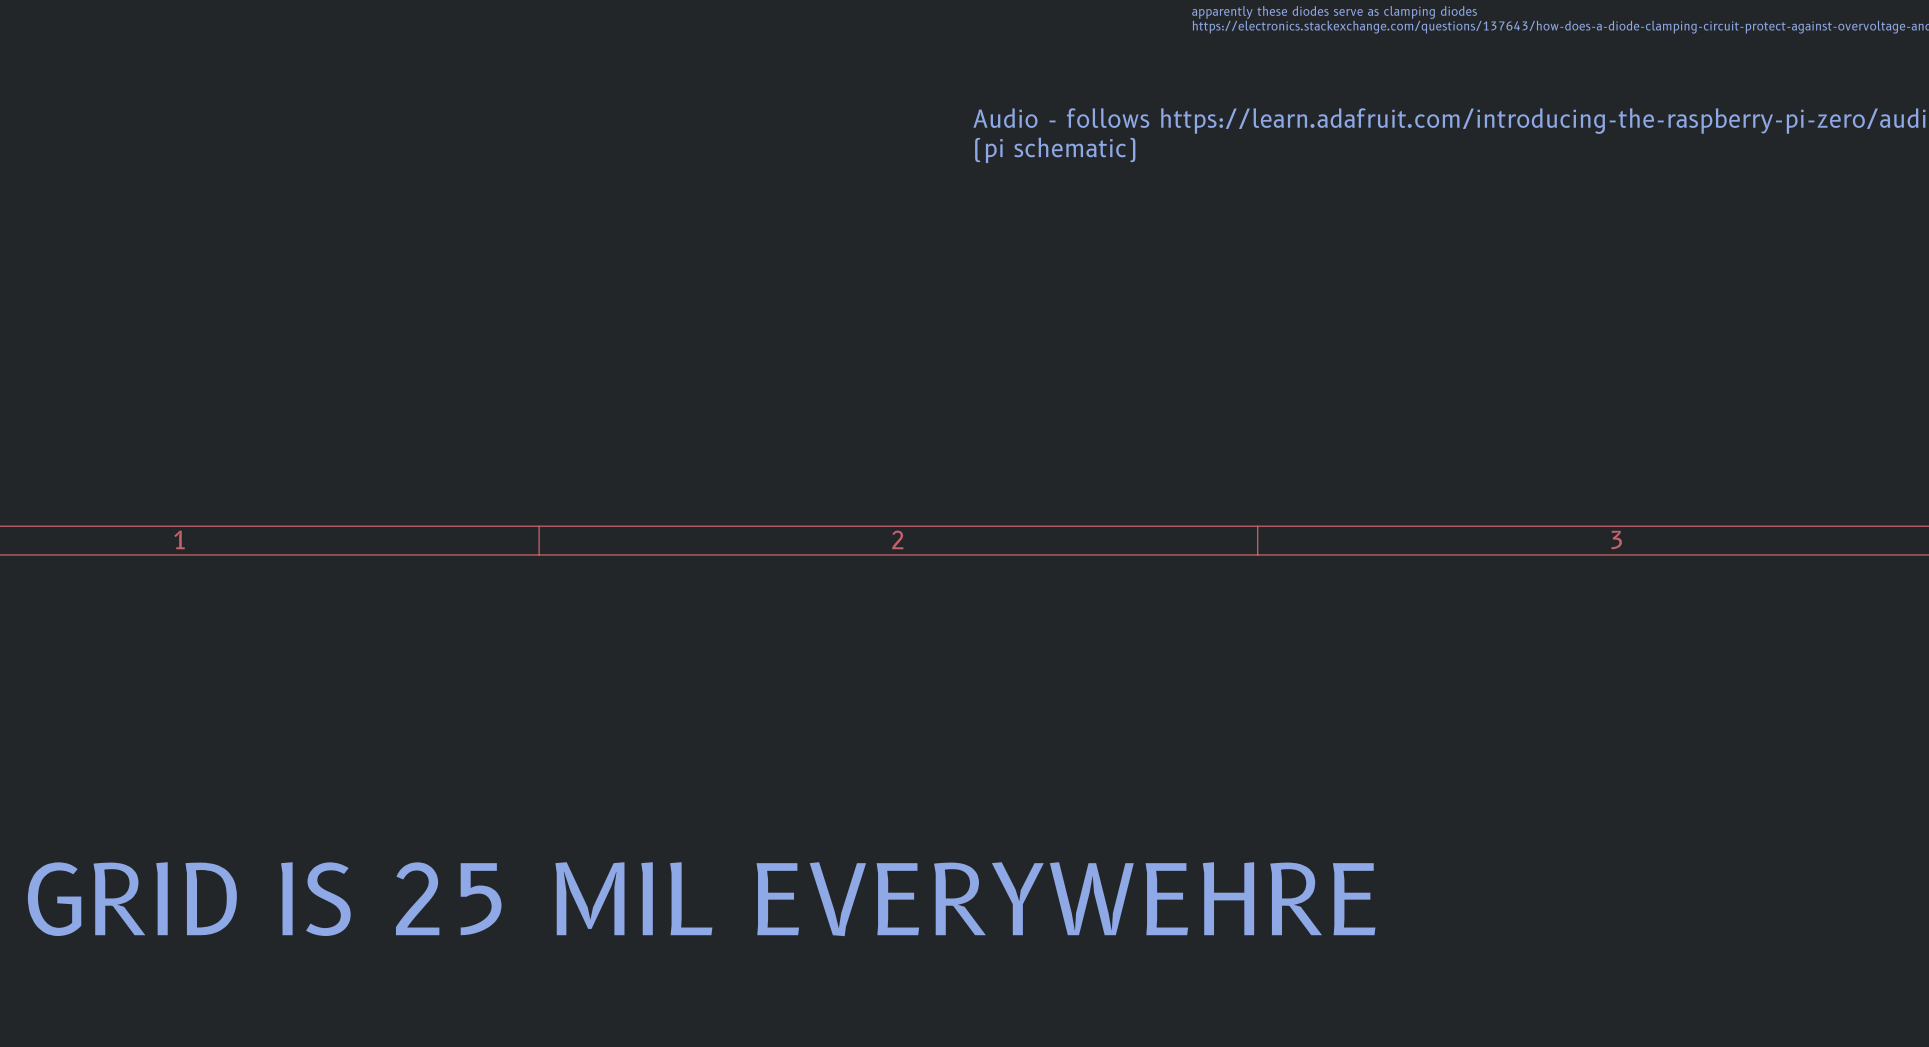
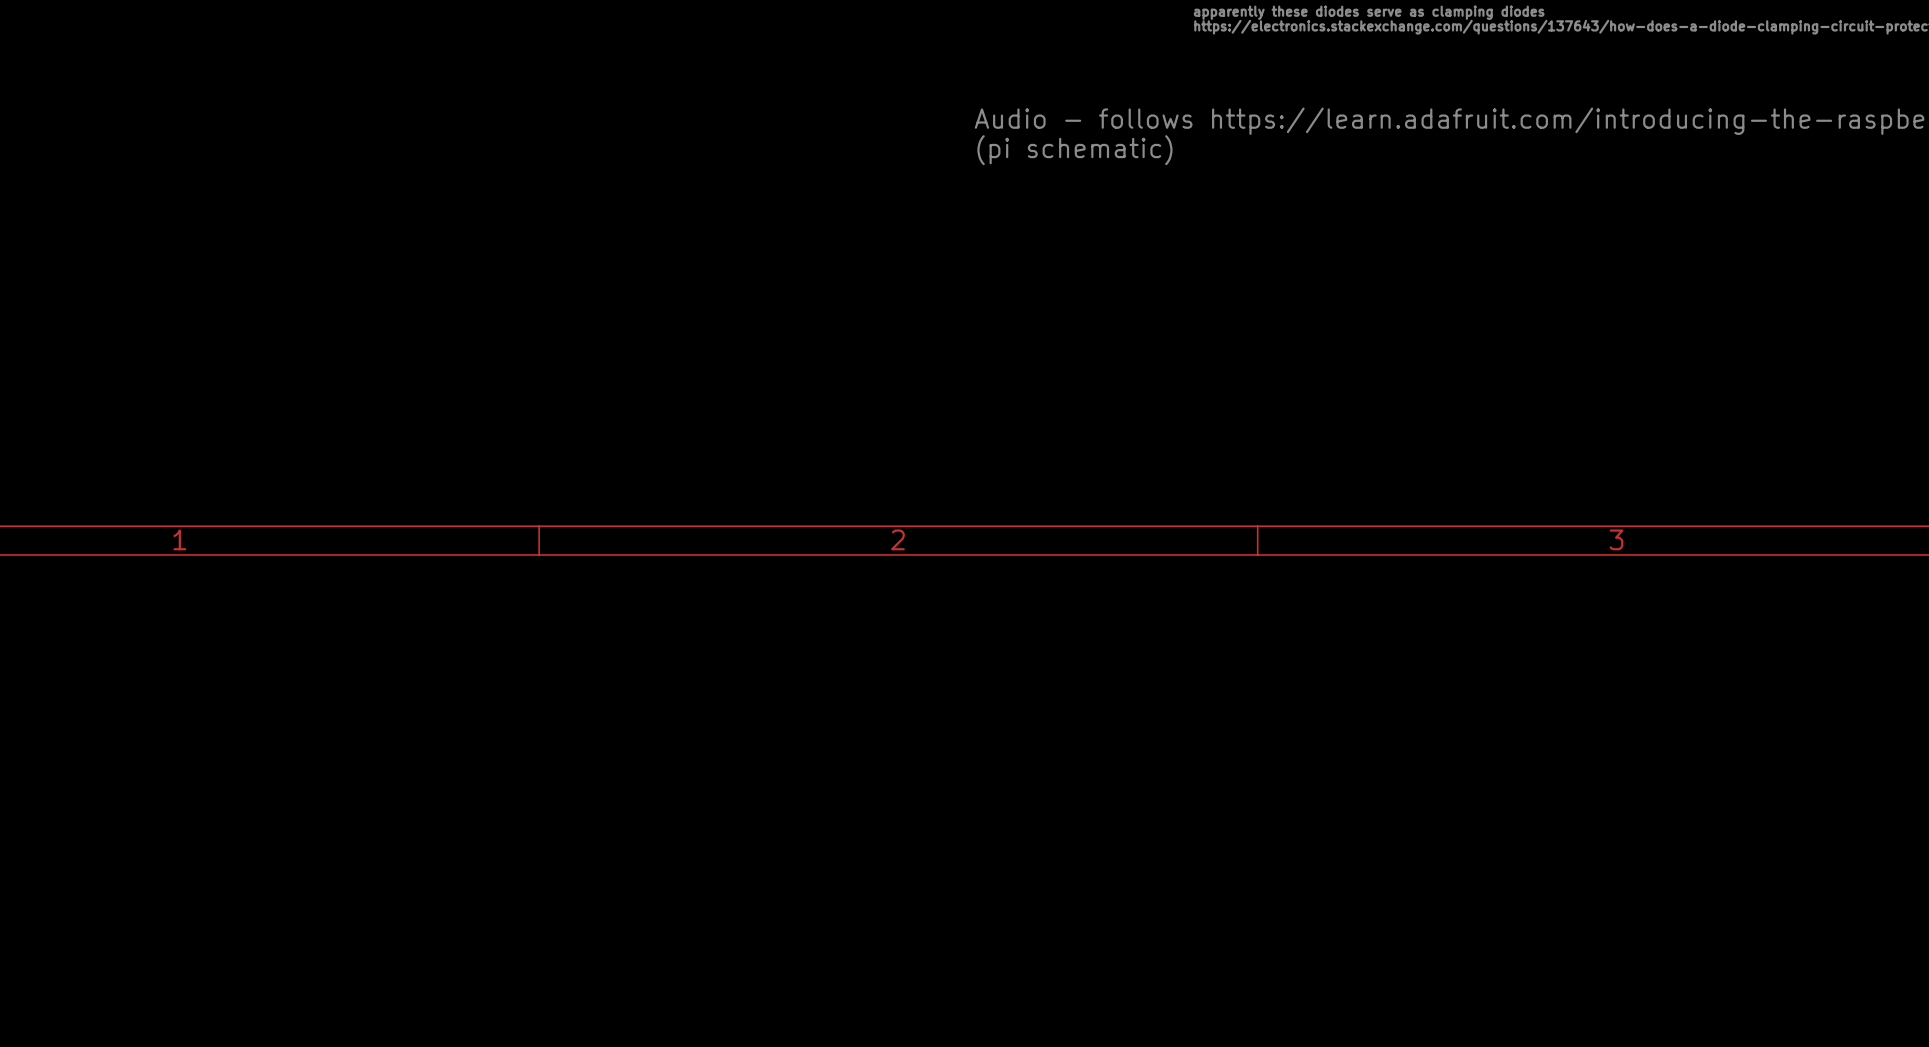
text: GRID IS 25 MIL EVERYWEHRE (701, 899) -> none

